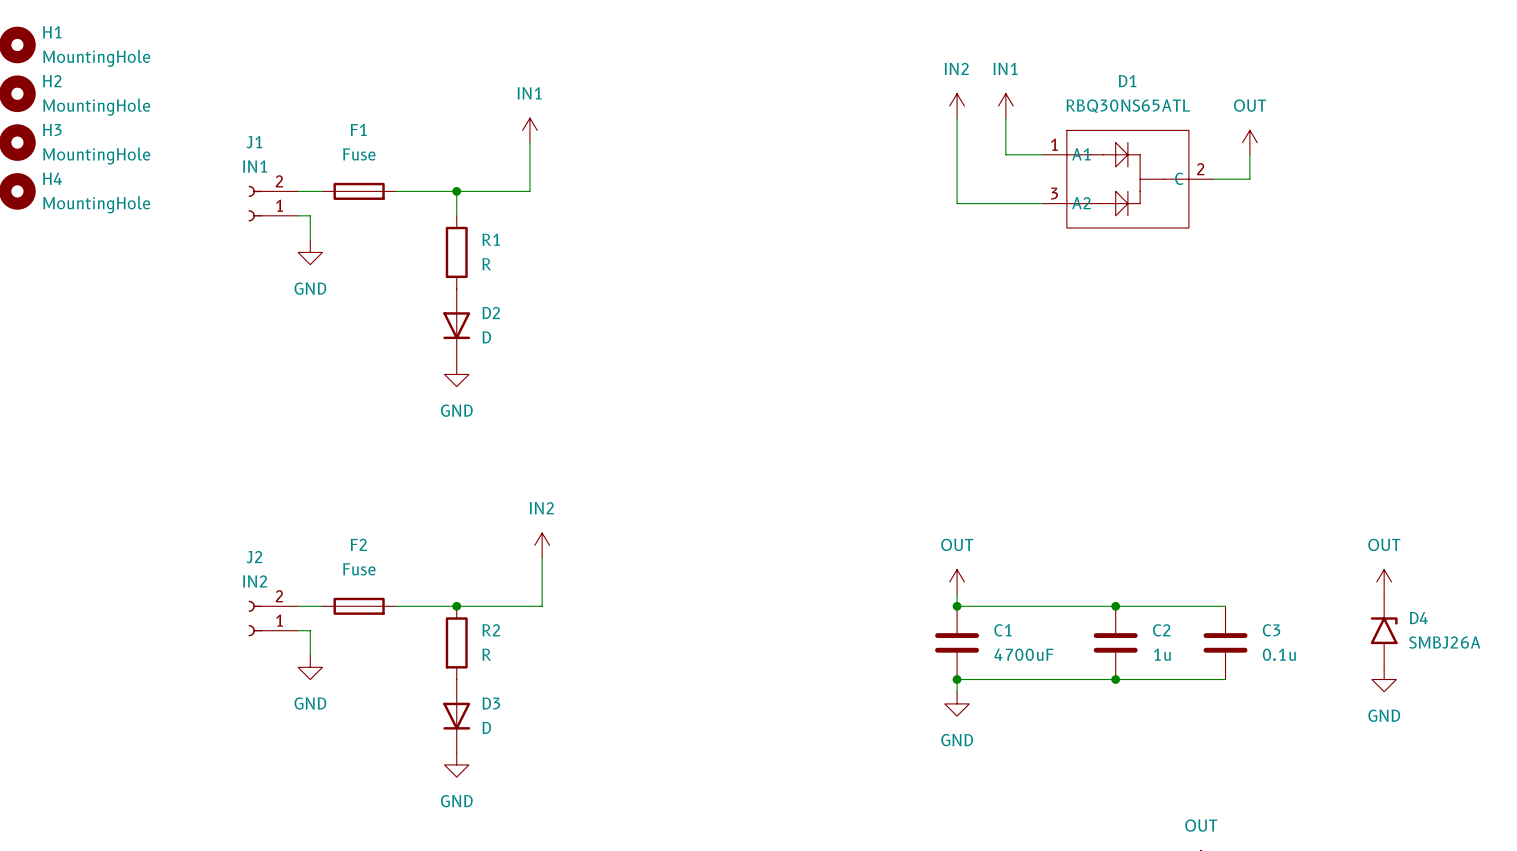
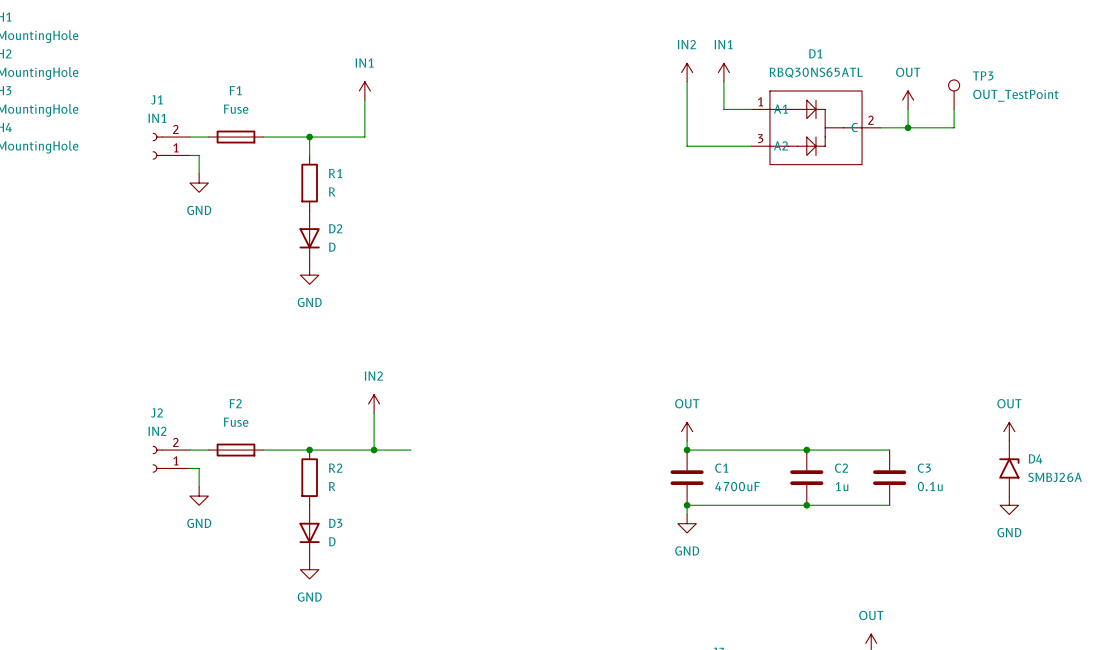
TP3: none -> OUT_TestPoint (954, 94)
wire: none -> (954, 109) (954, 127) (908, 127)
junction: none -> (908, 127)
wire: none -> (374, 450) (410, 450)
junction: none -> (374, 450)

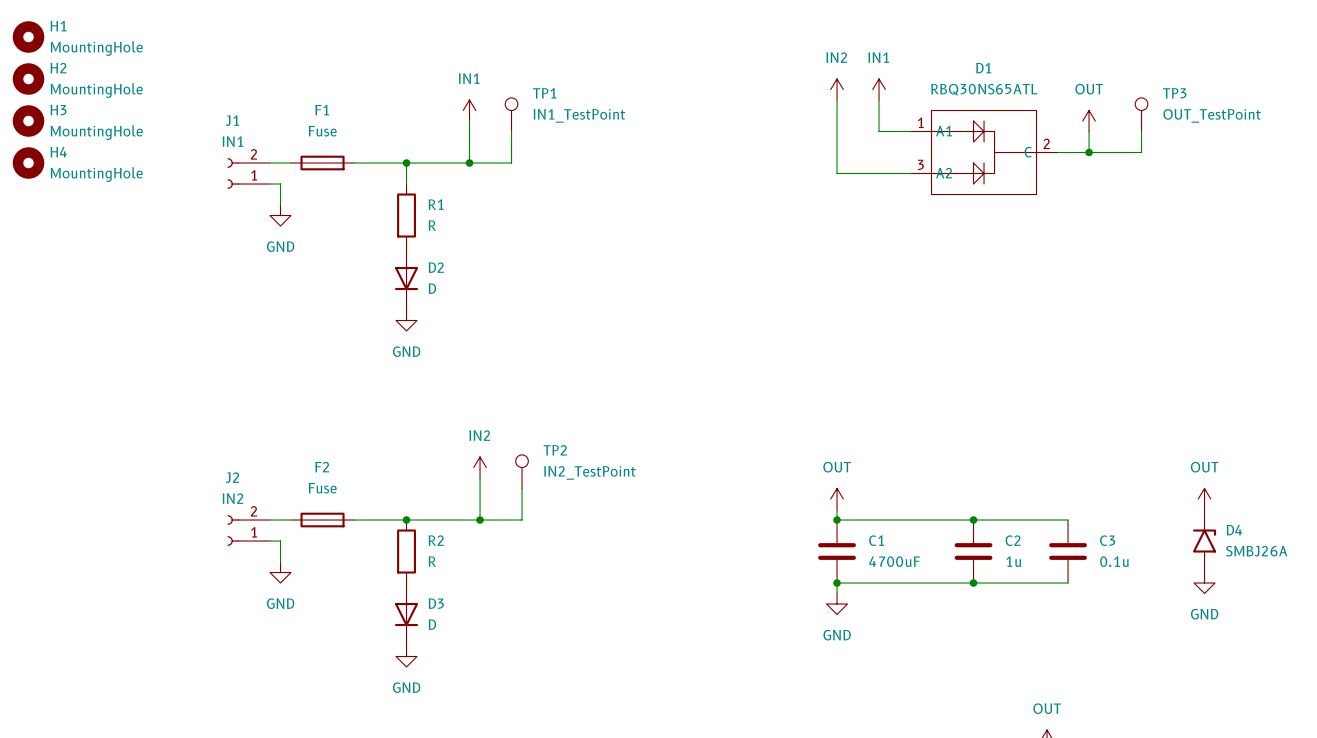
TP1: none -> IN1_TestPoint (511, 114)
wire: none -> (511, 131) (511, 163) (469, 163)
junction: none -> (469, 163)
TP2: none -> IN2_TestPoint (522, 471)
wire: none -> (522, 488) (522, 520)

